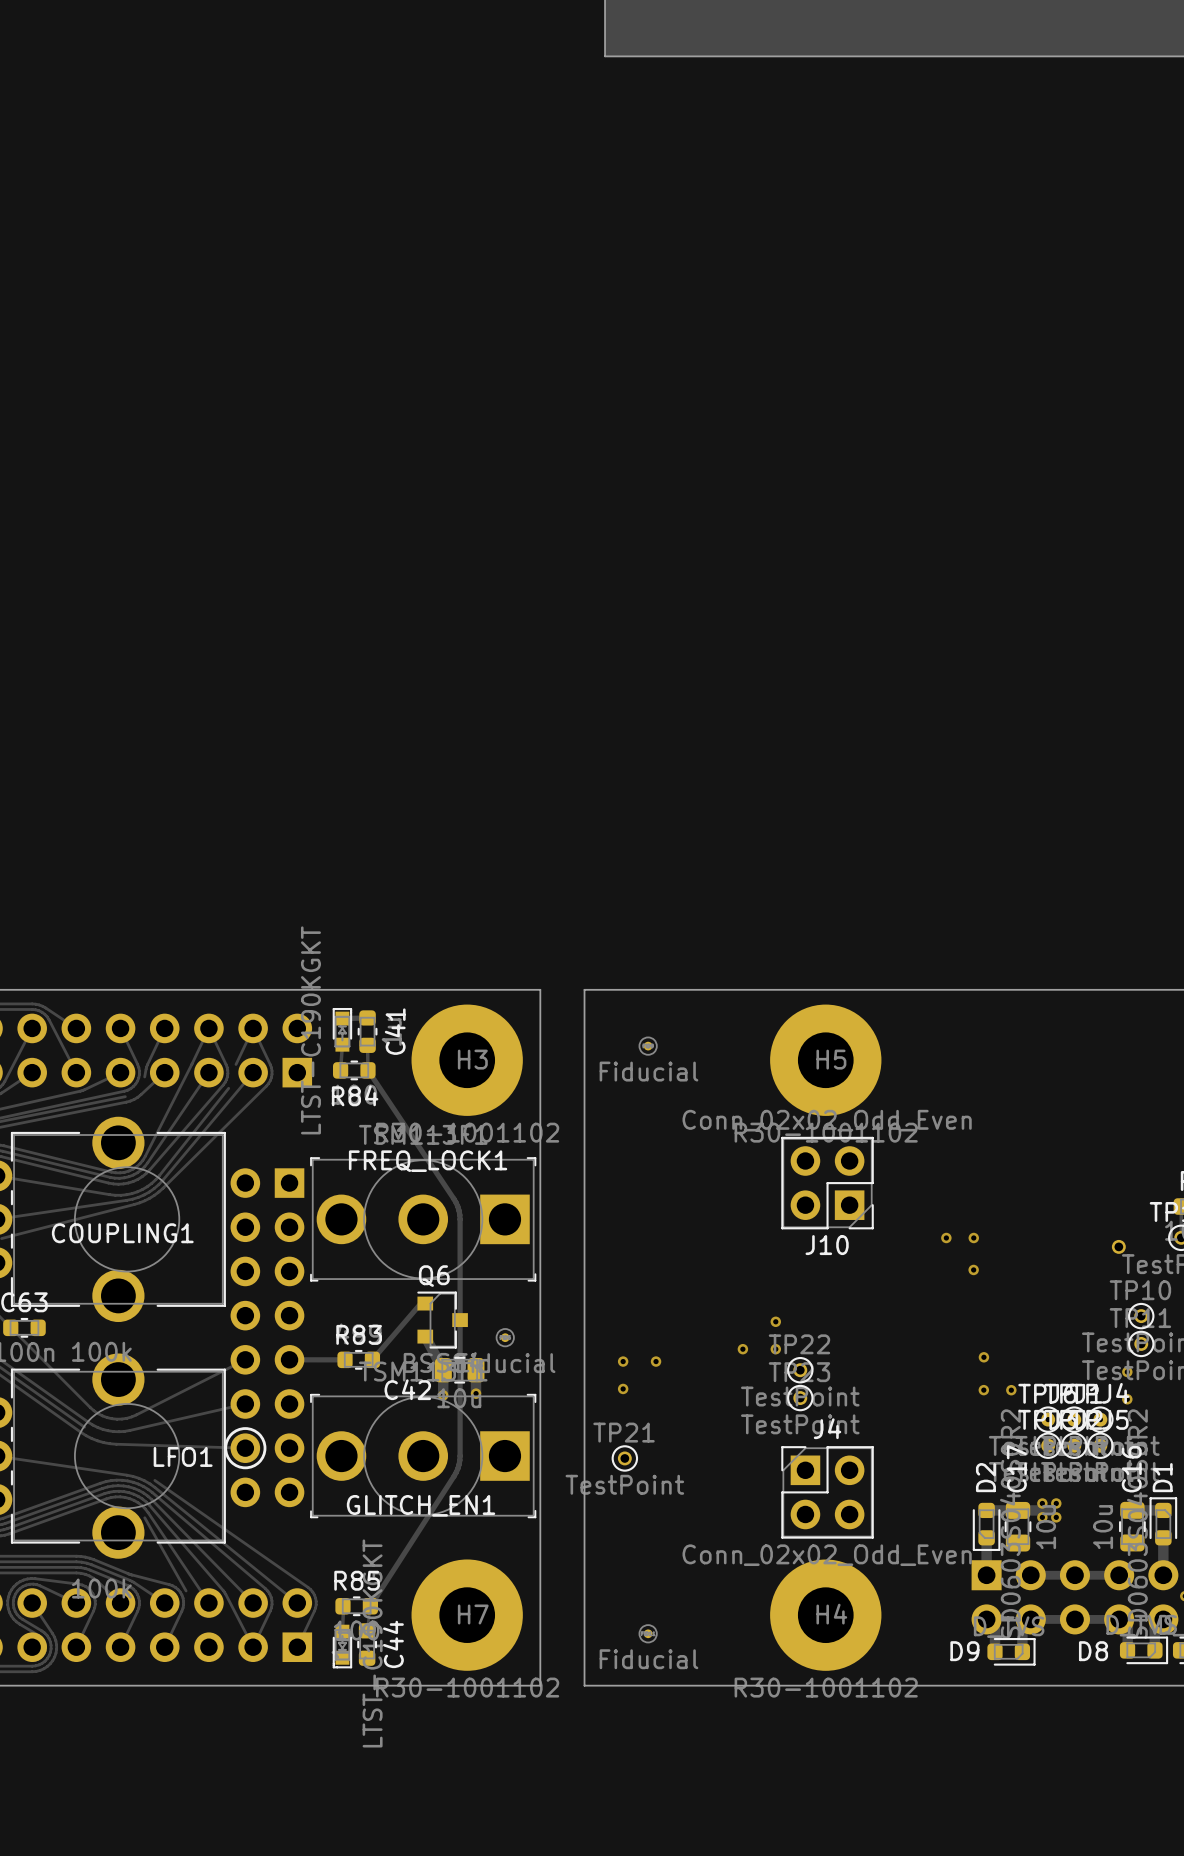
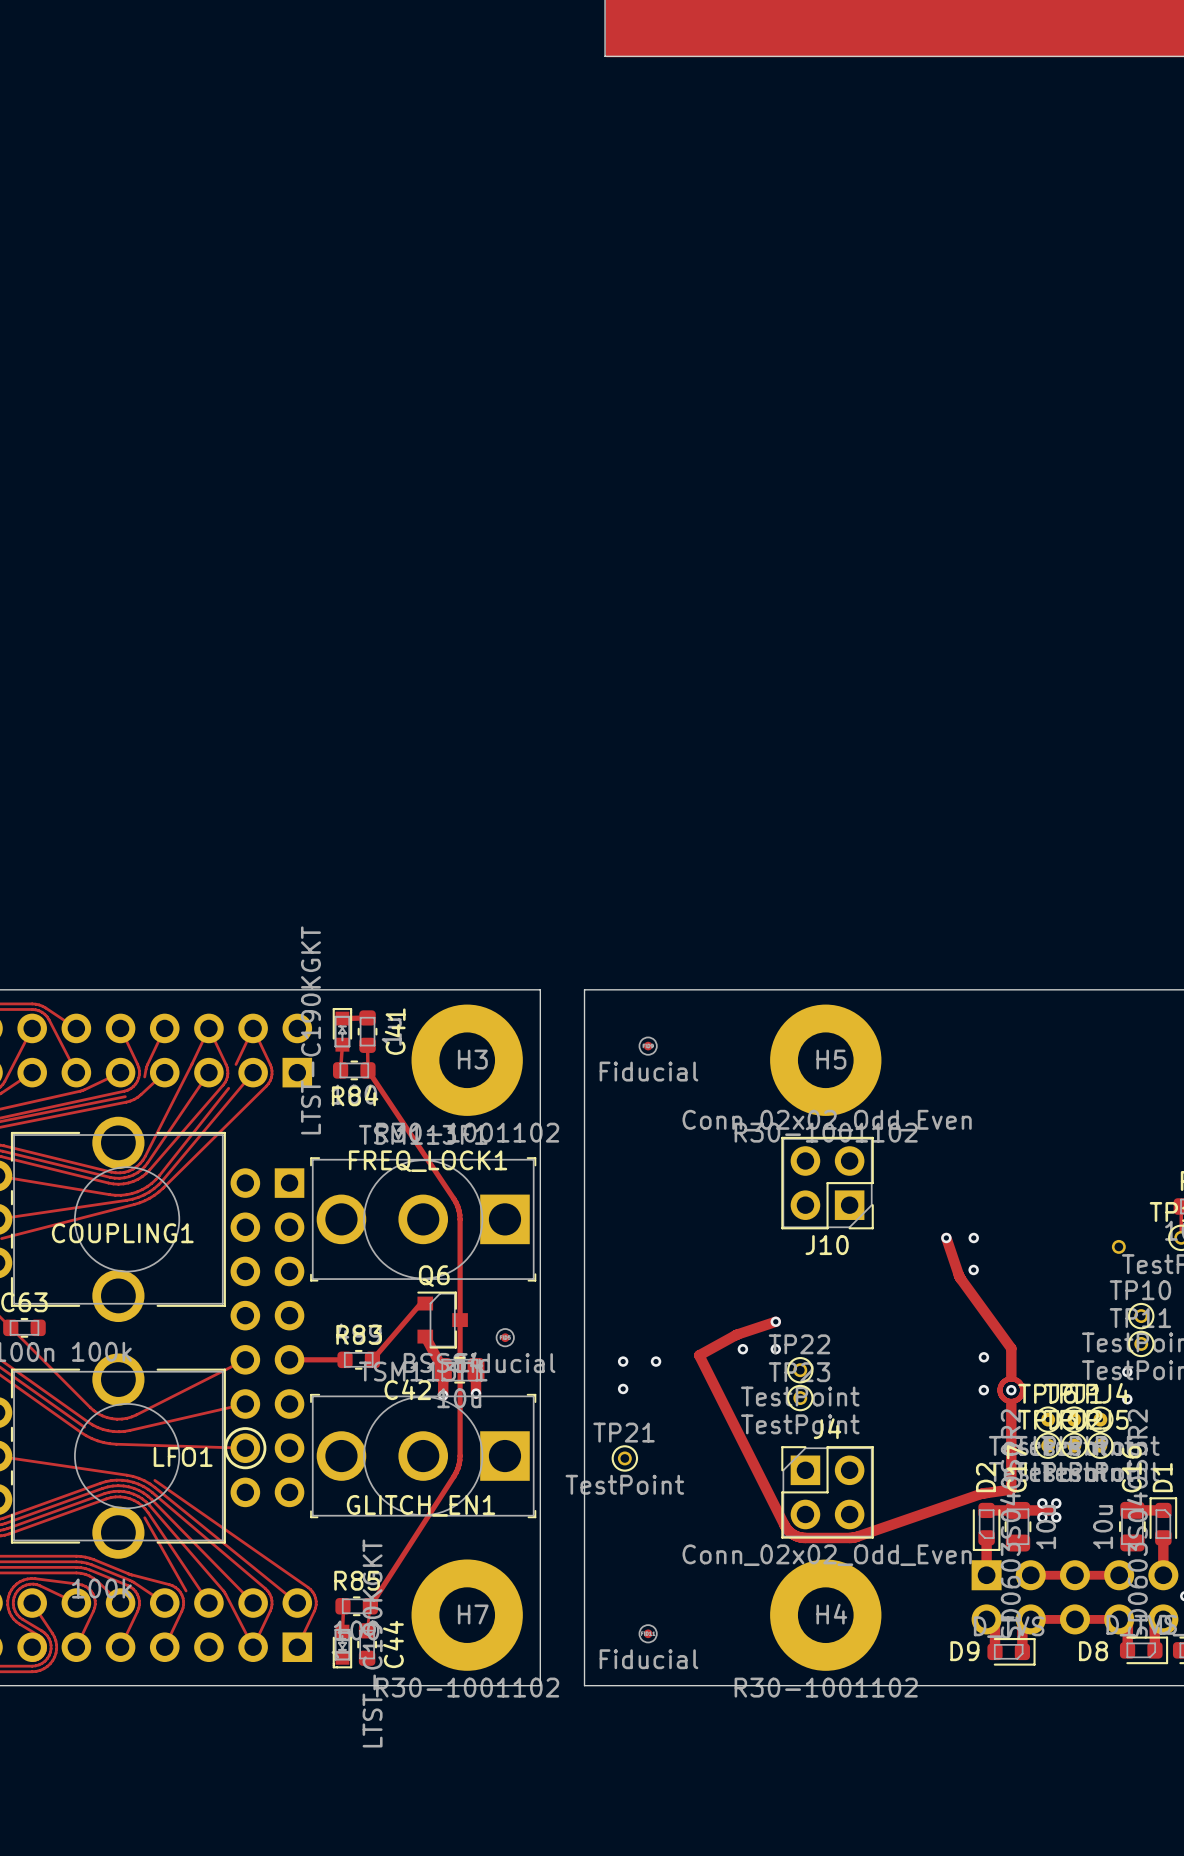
track: none -> (946, 1237) (960, 1278) (1011, 1348) (1011, 1376)
track: none -> (775, 1321) (736, 1334) (699, 1355) (784, 1525) (789, 1531) (796, 1536) (854, 1537) (980, 1493) (1011, 1489) (1011, 1404)
track: none -> (1011, 1378) (1003, 1381) (1000, 1389) (1002, 1397) (1011, 1401) (1019, 1398) (1022, 1390) (1019, 1382) (1011, 1378)

